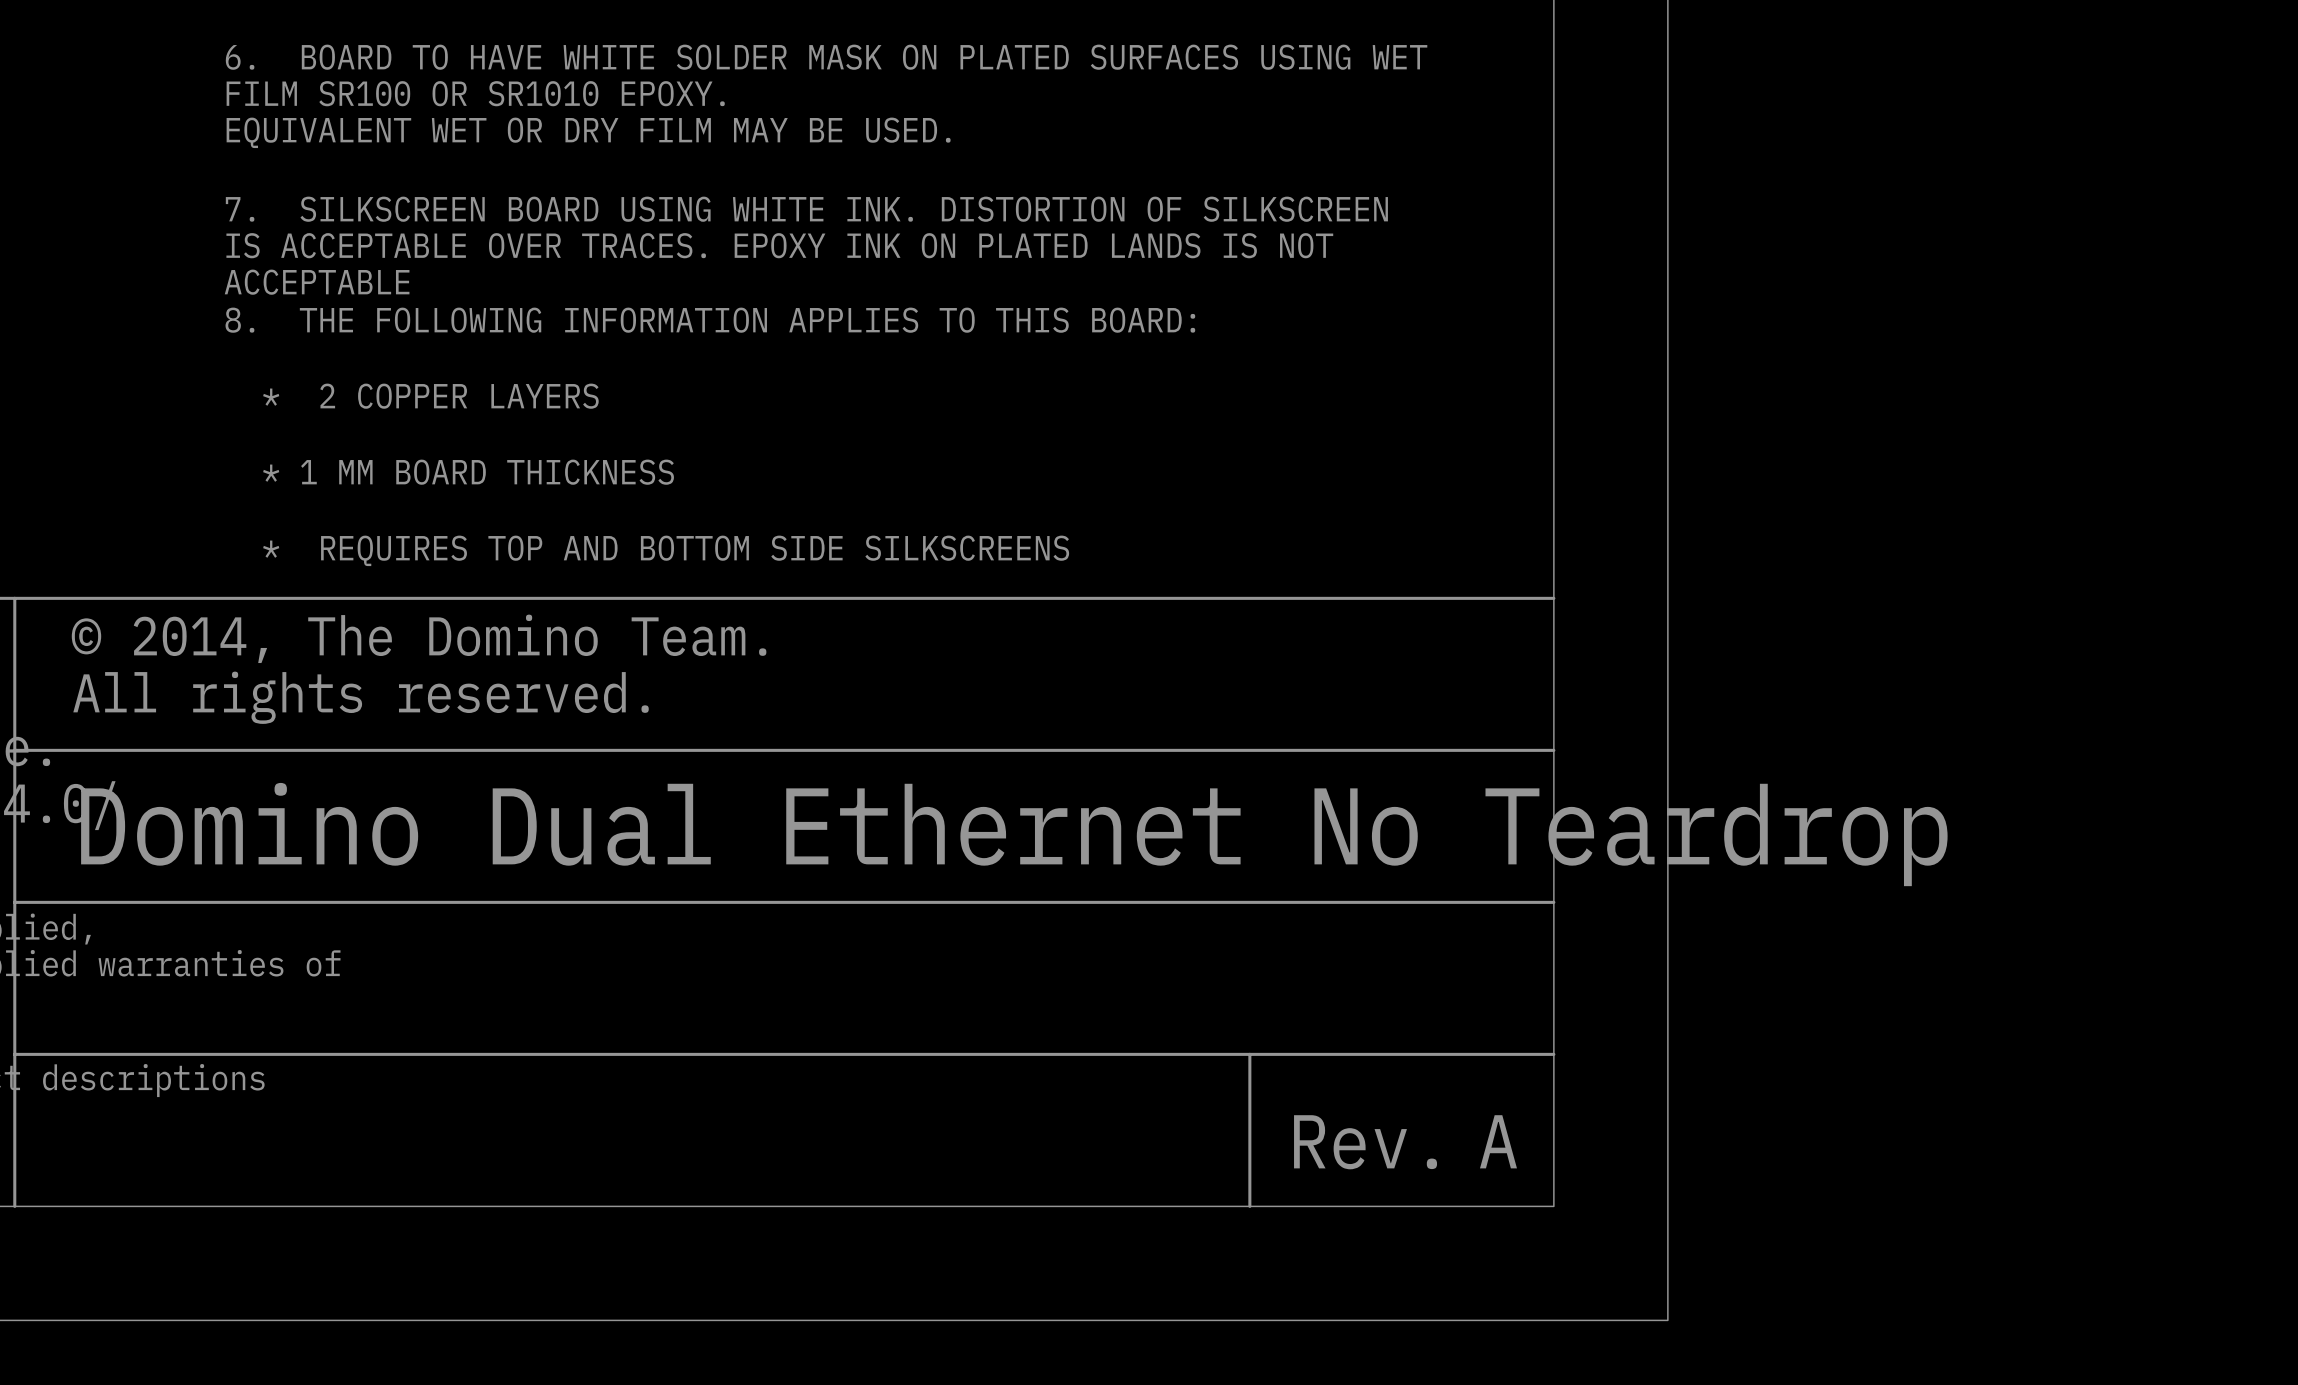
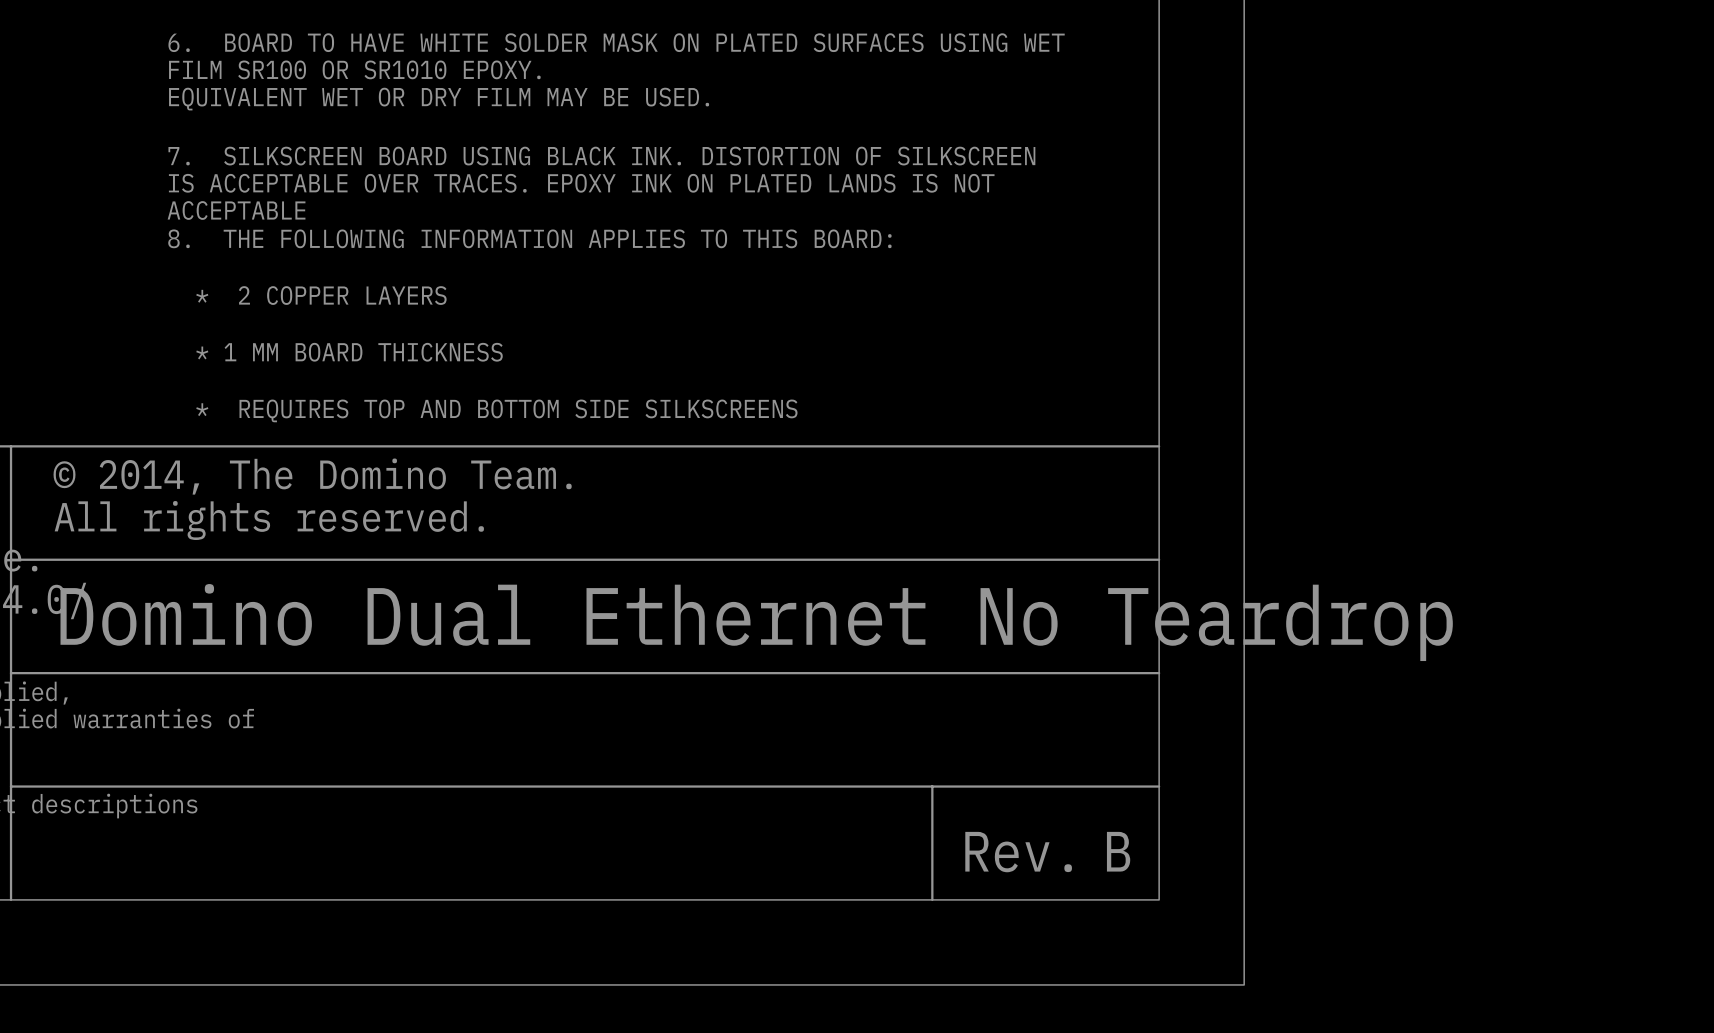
text: 7. SILKSCREEN BOARD USING WHITE INK. DISTORTION OF SILKSCREEN (806, 209) -> 7. SILKSCREEN BOARD USING BLACK INK. DISTORTION OF SILKSCREEN (601, 156)
text: A (1498, 1141) -> B (1118, 851)

